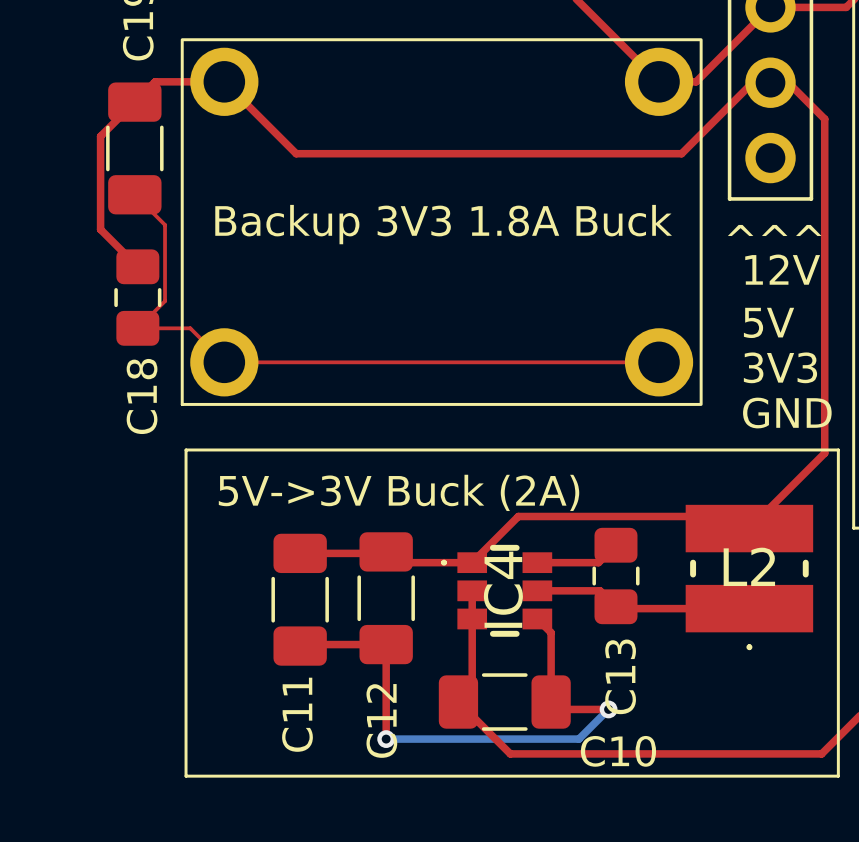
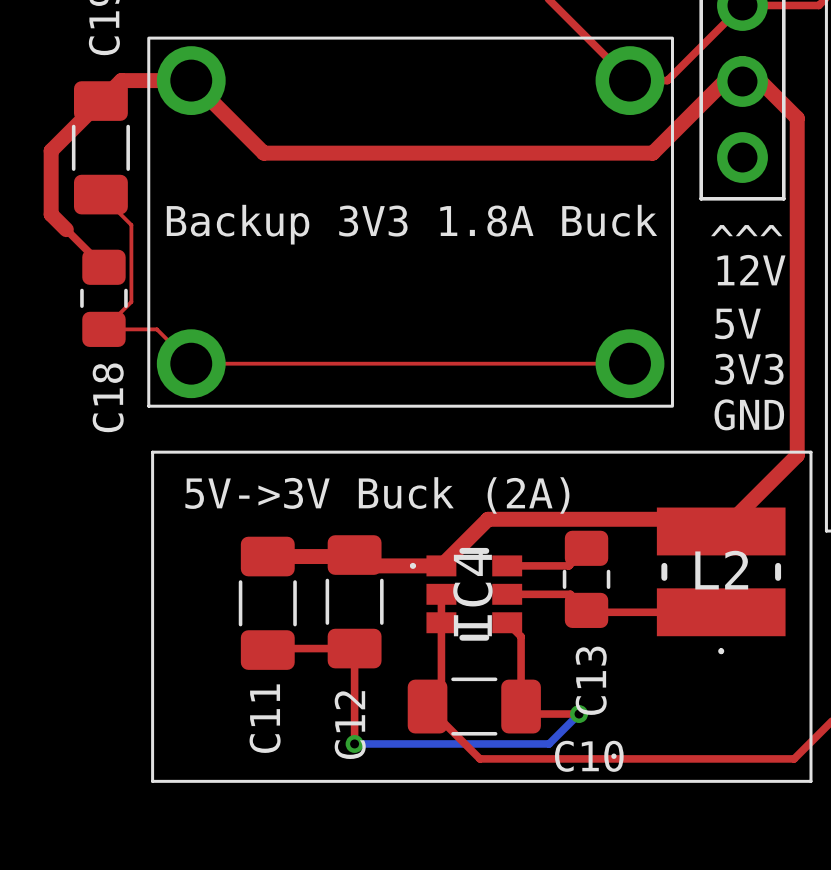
top track: (100, 136) (100, 229) -> (66, 135) (51, 150) (51, 214) (66, 229)
top track width: thin (100, 136) (155, 81) (224, 81) (296, 153) (681, 153) (770, 64) (824, 119) (824, 453) (749, 528) (737, 516) (518, 516) (472, 562) (398, 562) (388, 551) (300, 553) -> thick (66, 135) (121, 80) (191, 80) (263, 153) (652, 153) (742, 63) (797, 118) (797, 455) (721, 531) (709, 519) (488, 519) (441, 565) (367, 565) (356, 555) (267, 556)

